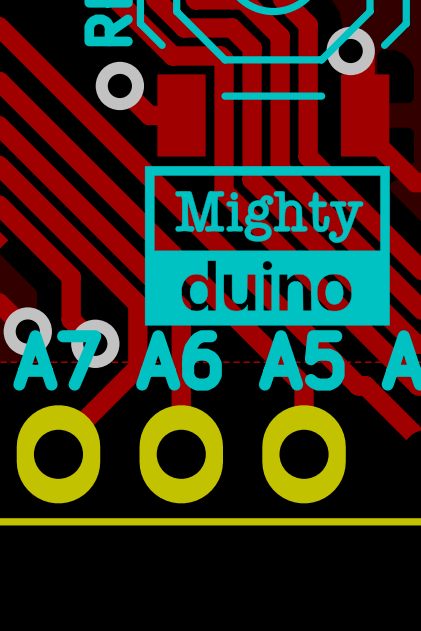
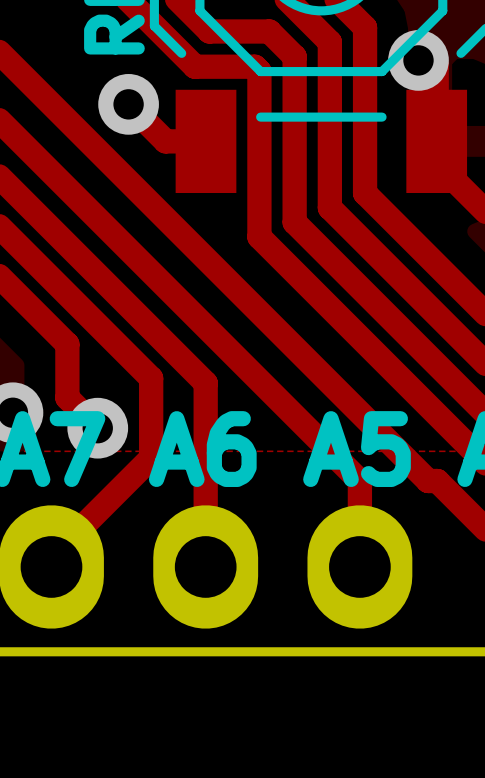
drawing: [144, 166, 390, 326] -> none

